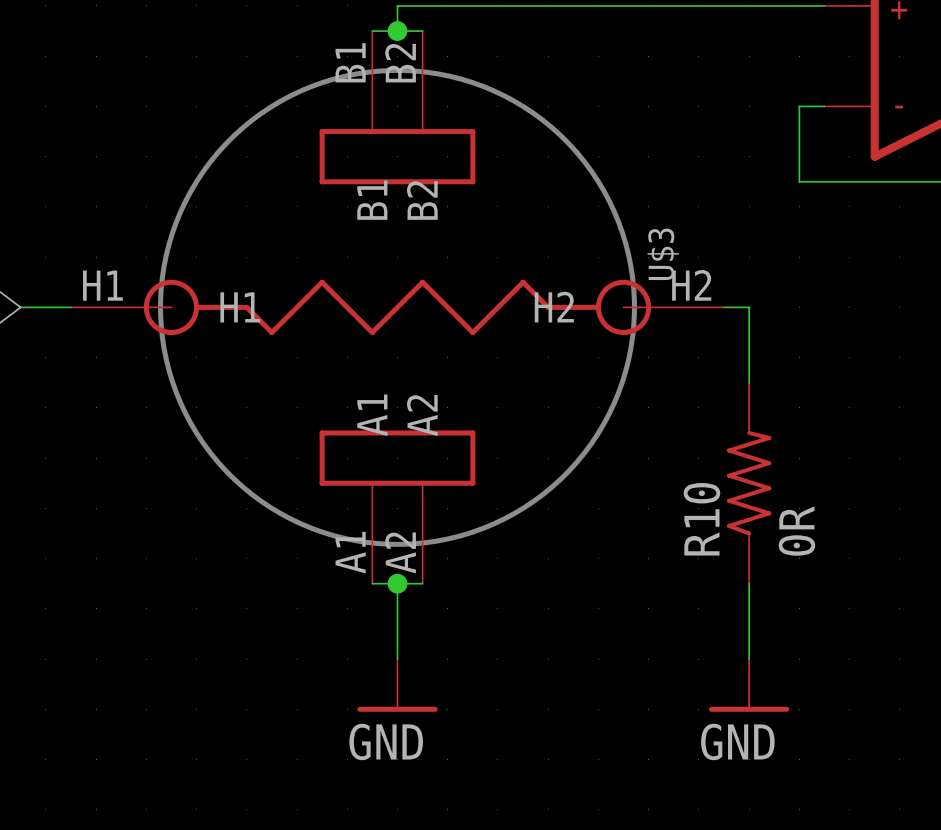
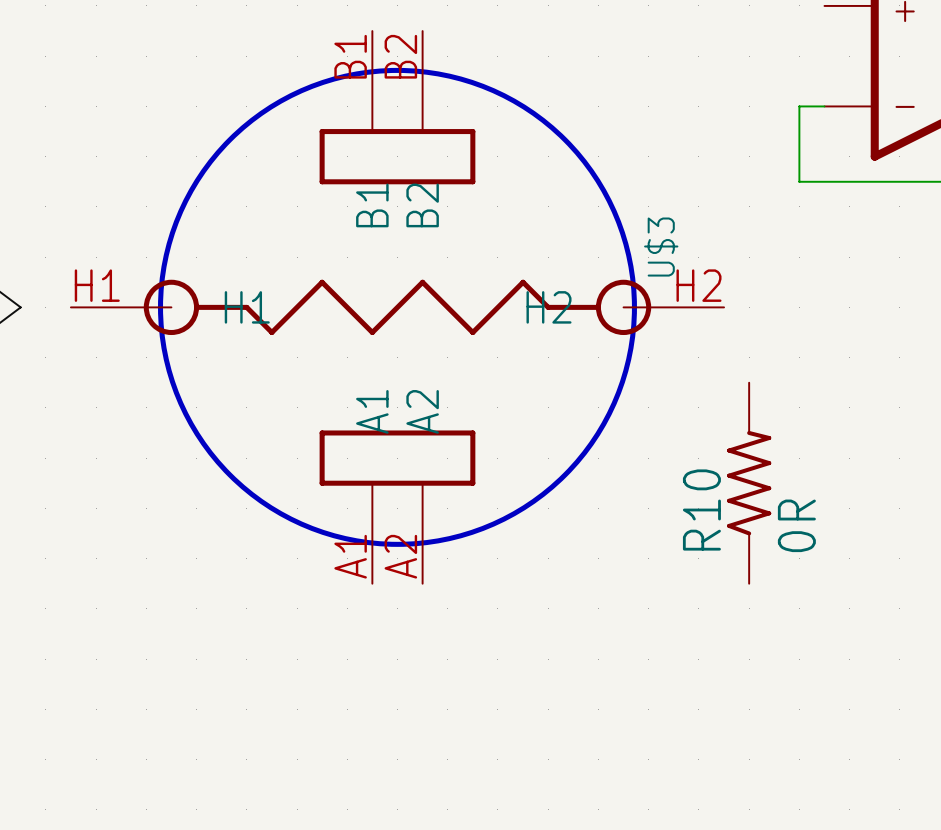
wire: (824, 5) (397, 5) (397, 31) -> none
wire: (372, 31) (422, 31) -> none
junction: (397, 31) -> none
wire: (20, 307) (70, 307) -> none
wire: (724, 307) (749, 307) (749, 382) -> none
wire: (372, 583) (422, 583) -> none
wire: (397, 583) (397, 659) -> none
junction: (397, 583) -> none
wire: (749, 583) (749, 659) -> none
power symbol: GND (397, 685) -> none
power symbol: GND (749, 685) -> none

